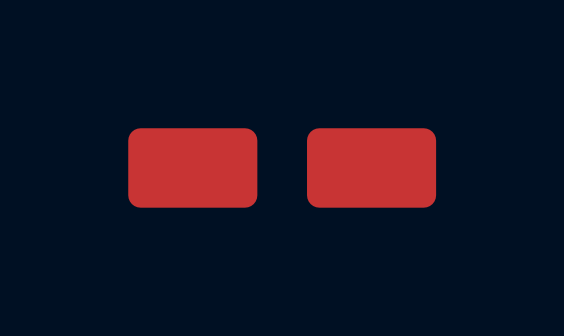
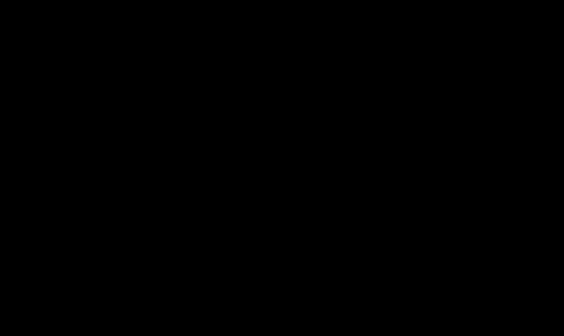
part: (282, 167) -> none

